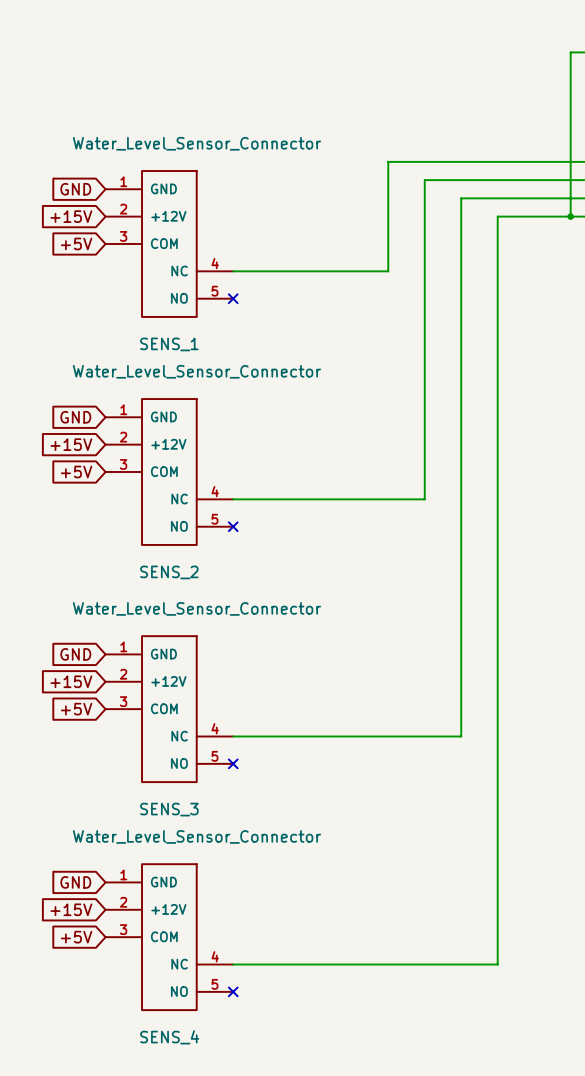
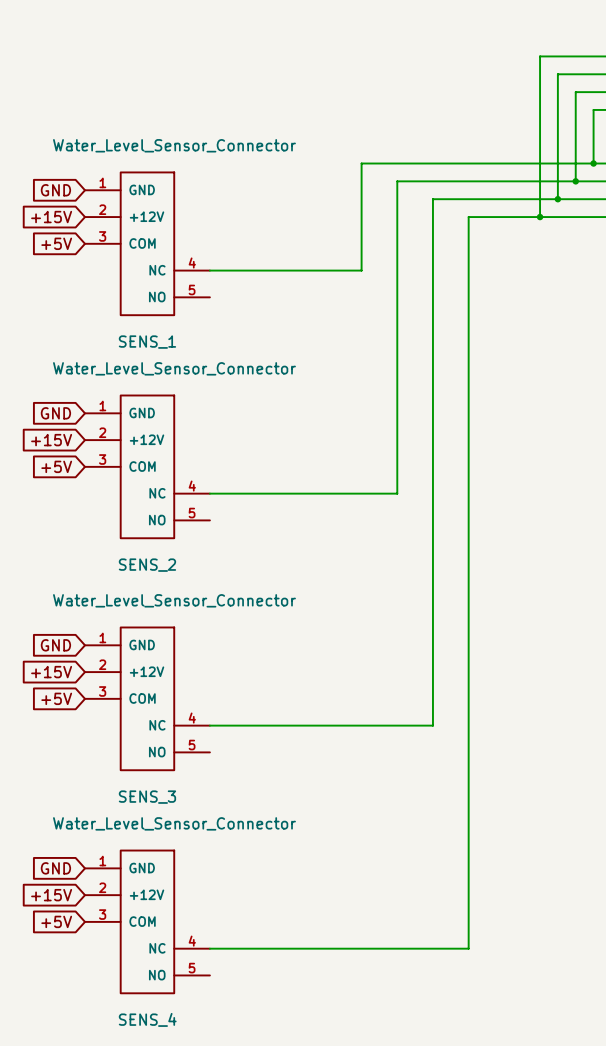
no-connect mark: (233, 298) -> none
no-connect mark: (233, 526) -> none
no-connect mark: (233, 763) -> none
no-connect mark: (233, 991) -> none

